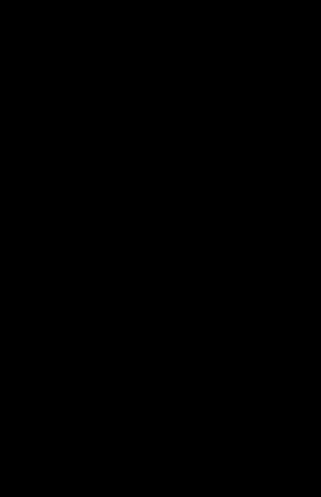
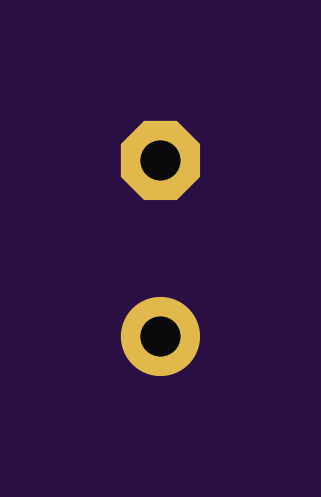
part: none -> (160, 248)

